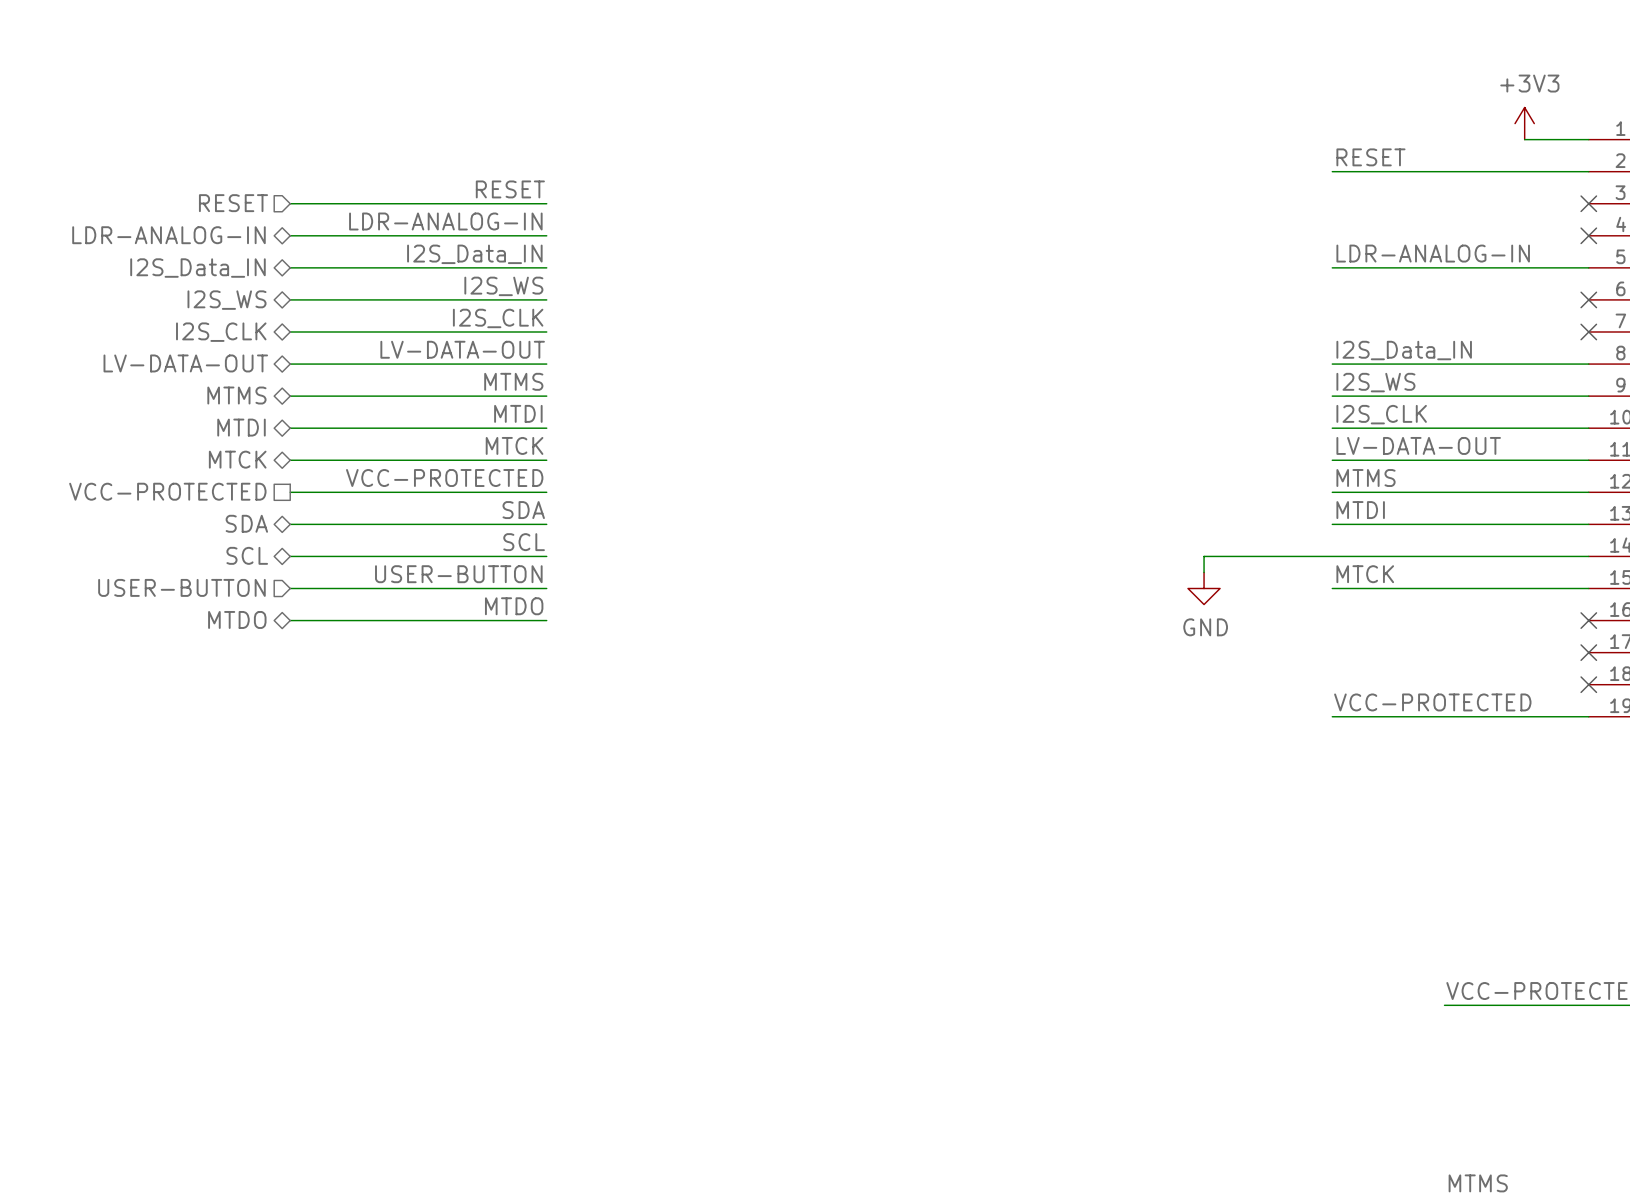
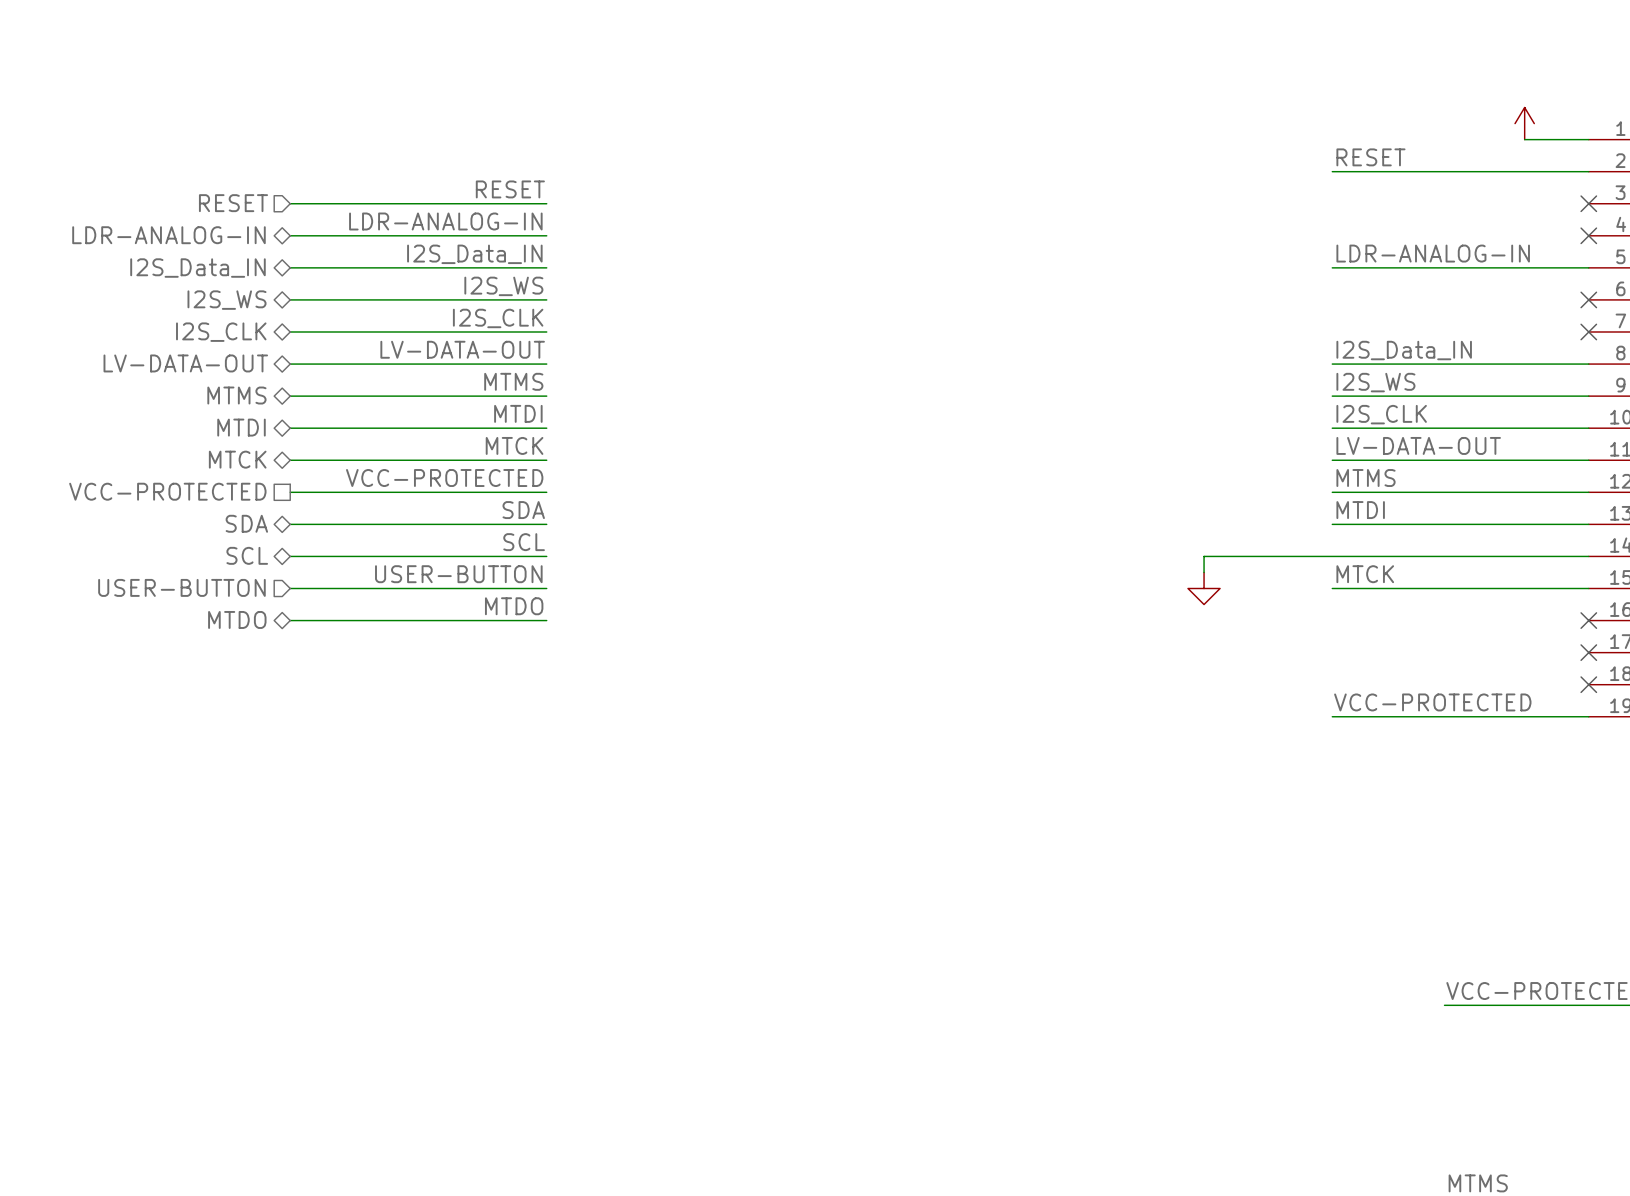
power symbol text: +3V3 (1529, 83) -> none
power symbol text: GND (1205, 627) -> none

